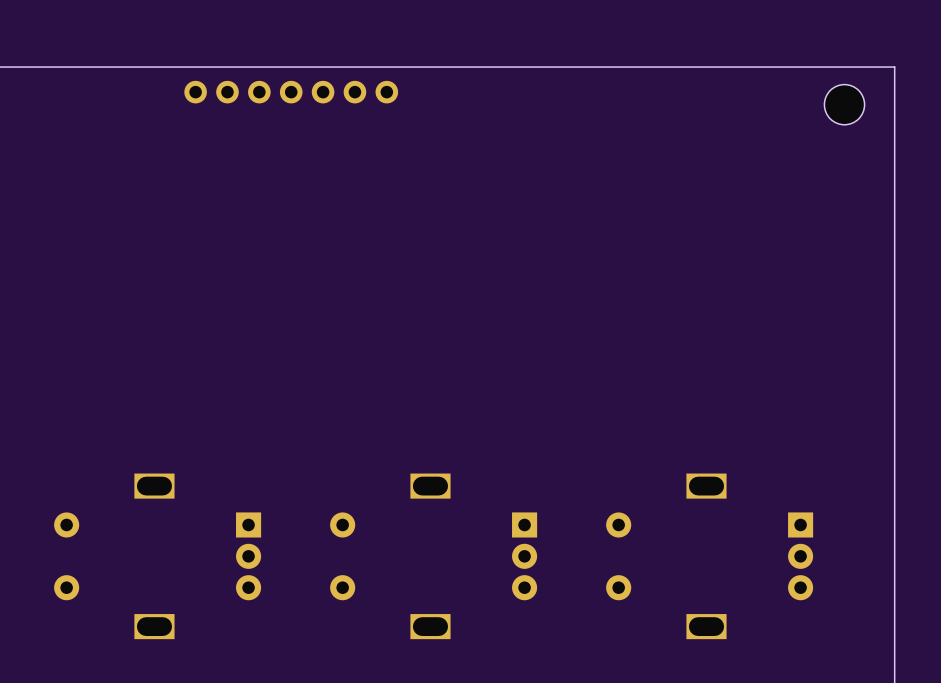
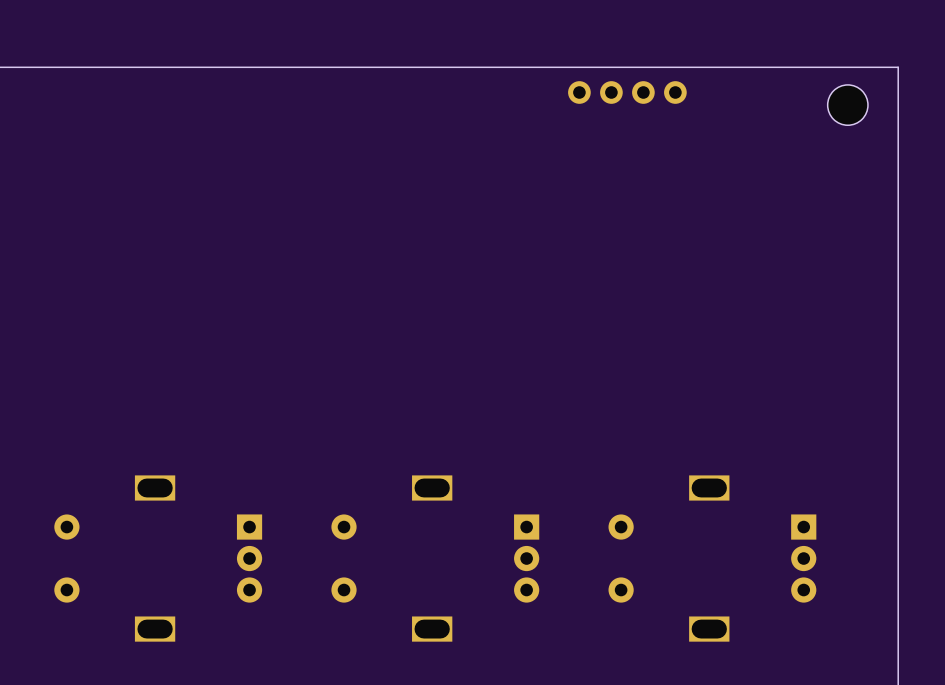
part: (291, 92) -> none
part: none -> (627, 92)

